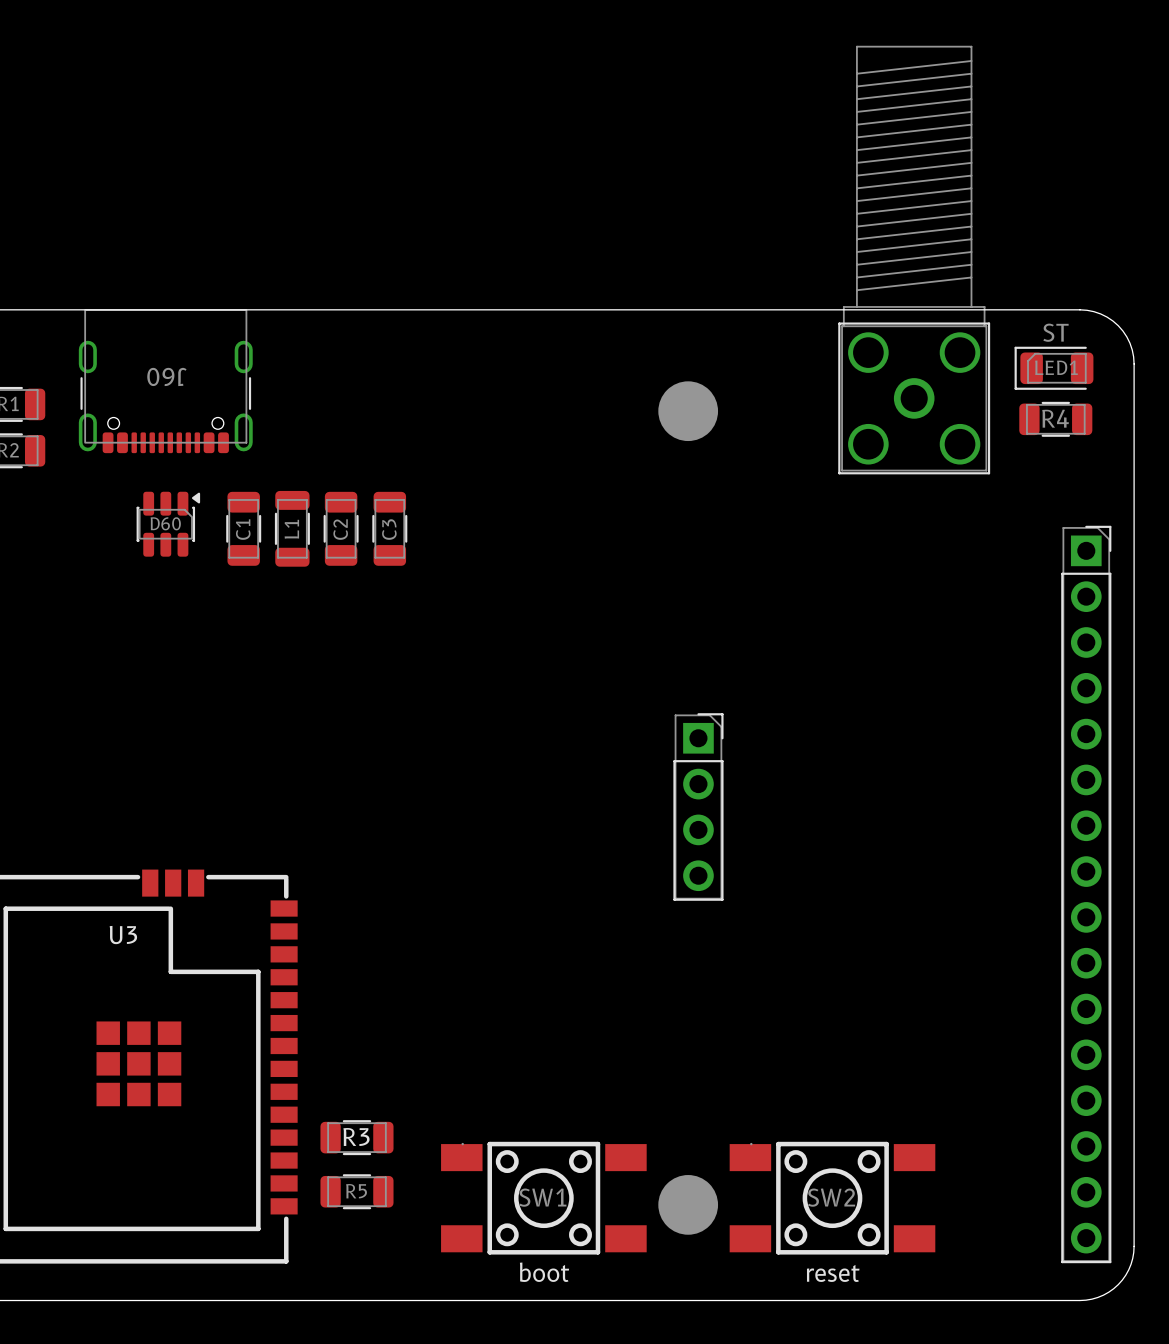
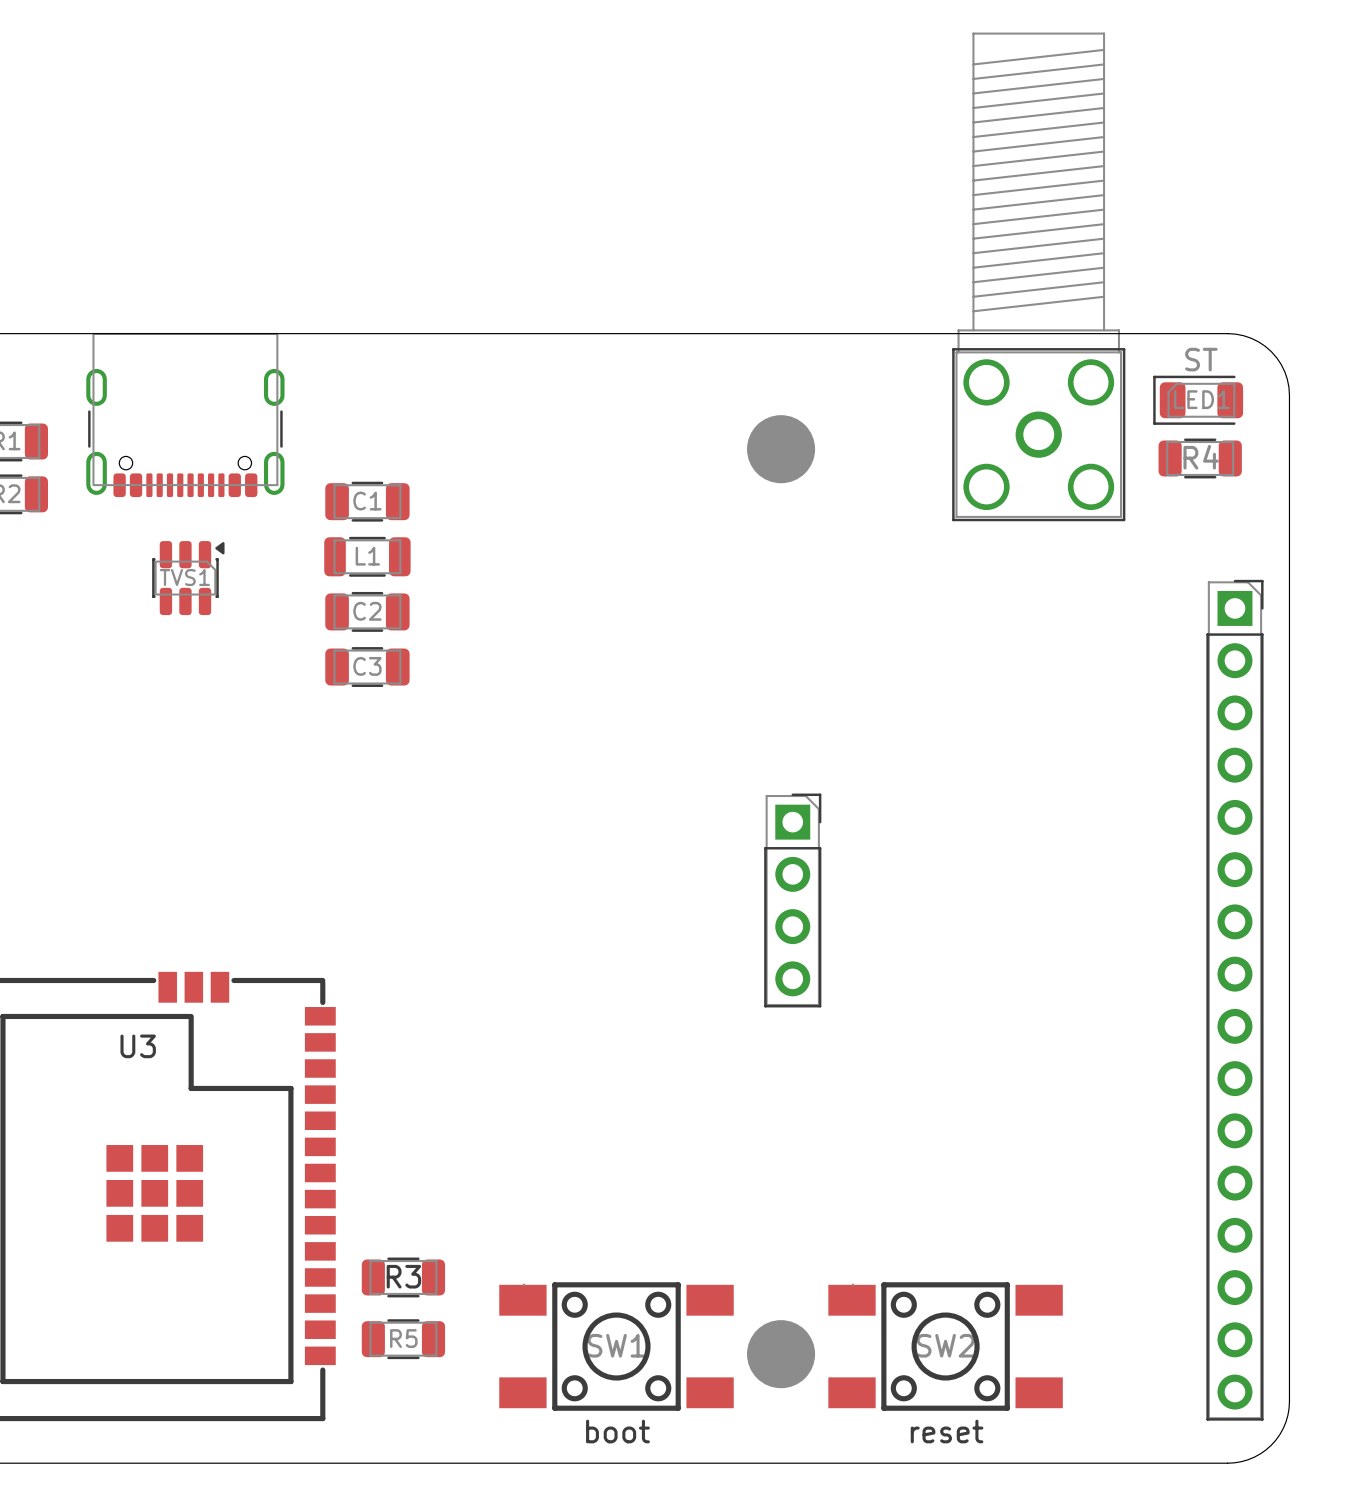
J60 name: J60 (166, 376) -> none
D60 name: D60 (165, 523) -> TVS1 (184, 577)
C1 rotation: 0° (243, 528) -> 90° clockwise (367, 501)
C1 position: (243, 528) -> (367, 501)
L1 rotation: 0° (292, 528) -> 90° clockwise (367, 556)
C2 rotation: 0° (341, 528) -> 90° clockwise (367, 611)
C3 rotation: 0° (389, 528) -> 90° clockwise (367, 667)
C3 position: (389, 528) -> (367, 667)

